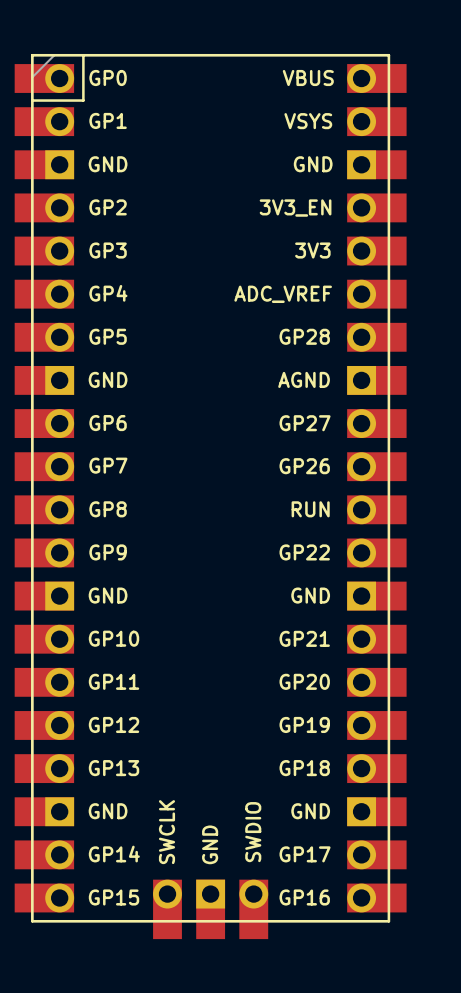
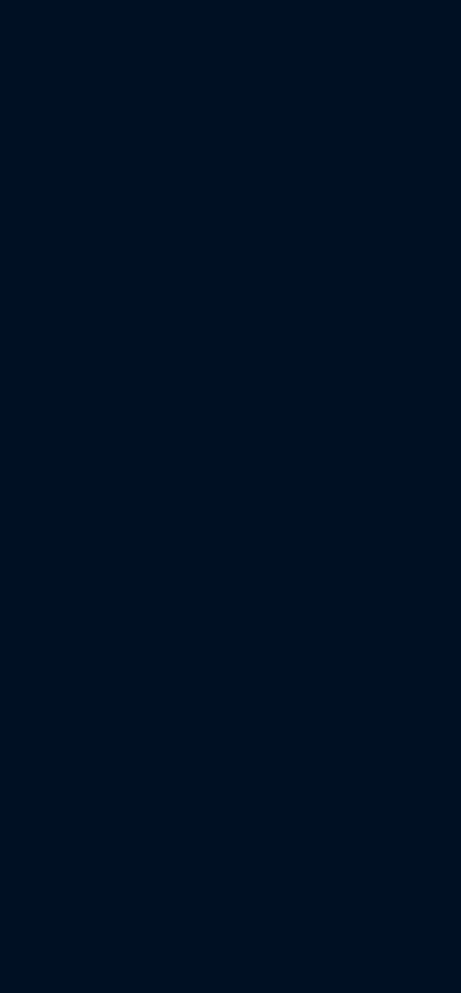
part: (210, 496) -> none

